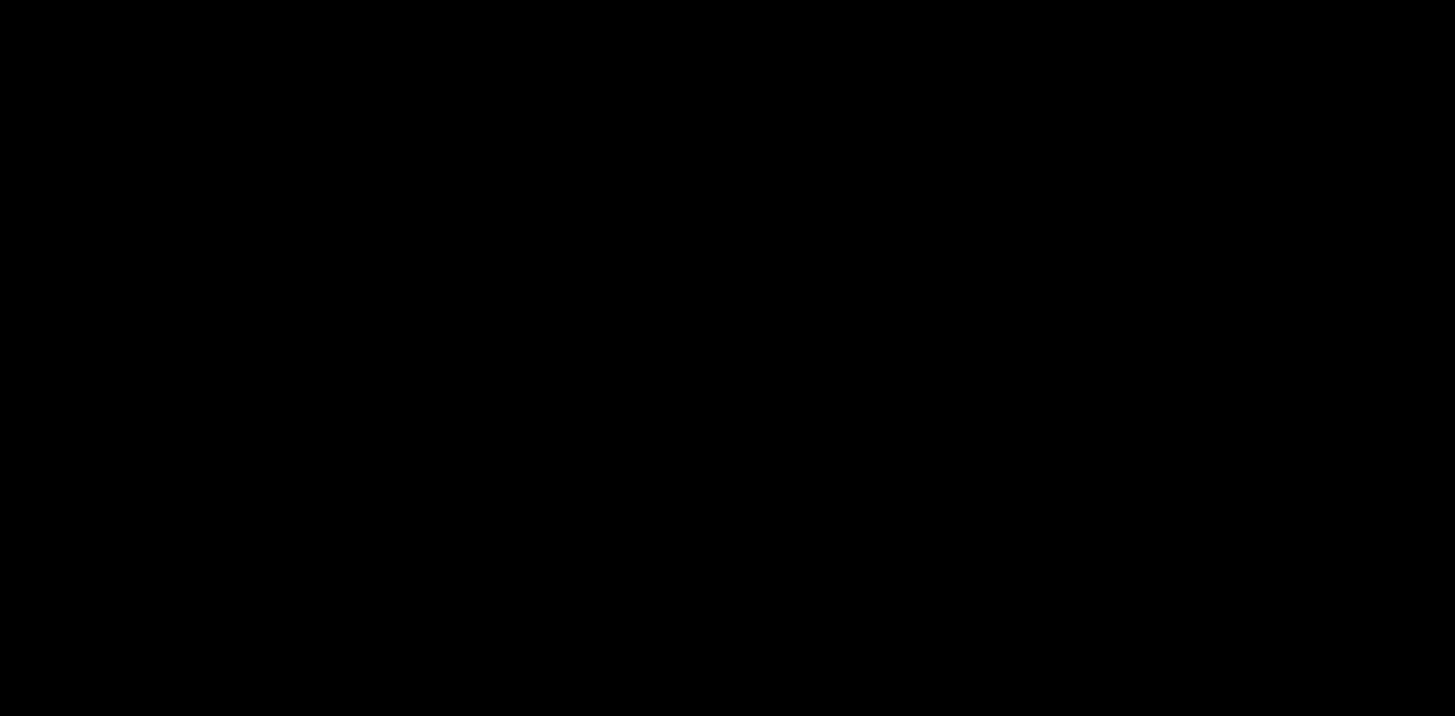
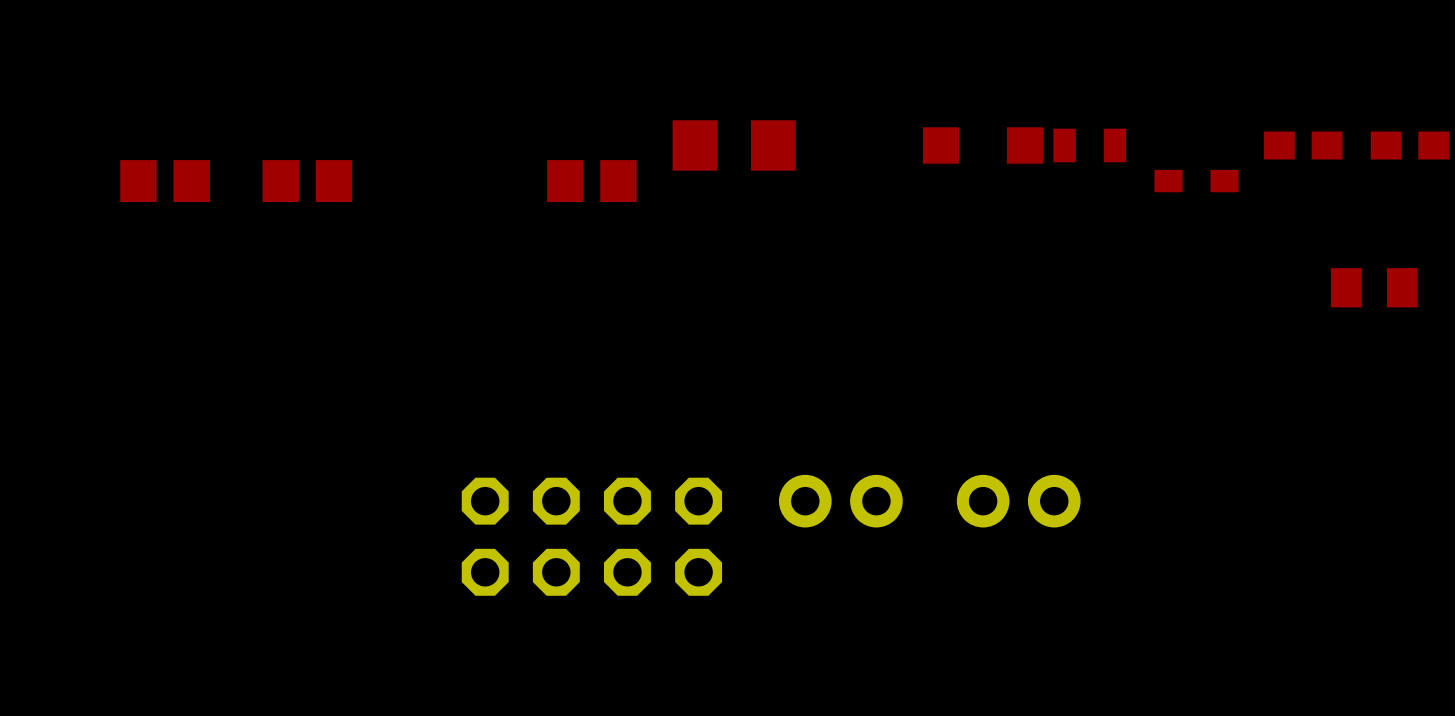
part: none -> (734, 145)
part: none -> (983, 145)
part: none -> (1089, 145)
part: none -> (1303, 145)
part: none -> (1409, 145)
part: none -> (165, 181)
part: none -> (307, 181)
part: none -> (591, 181)
part: none -> (1196, 181)
part: none -> (1374, 287)
part: none -> (840, 501)
part: none -> (1018, 501)
part: none -> (591, 536)

